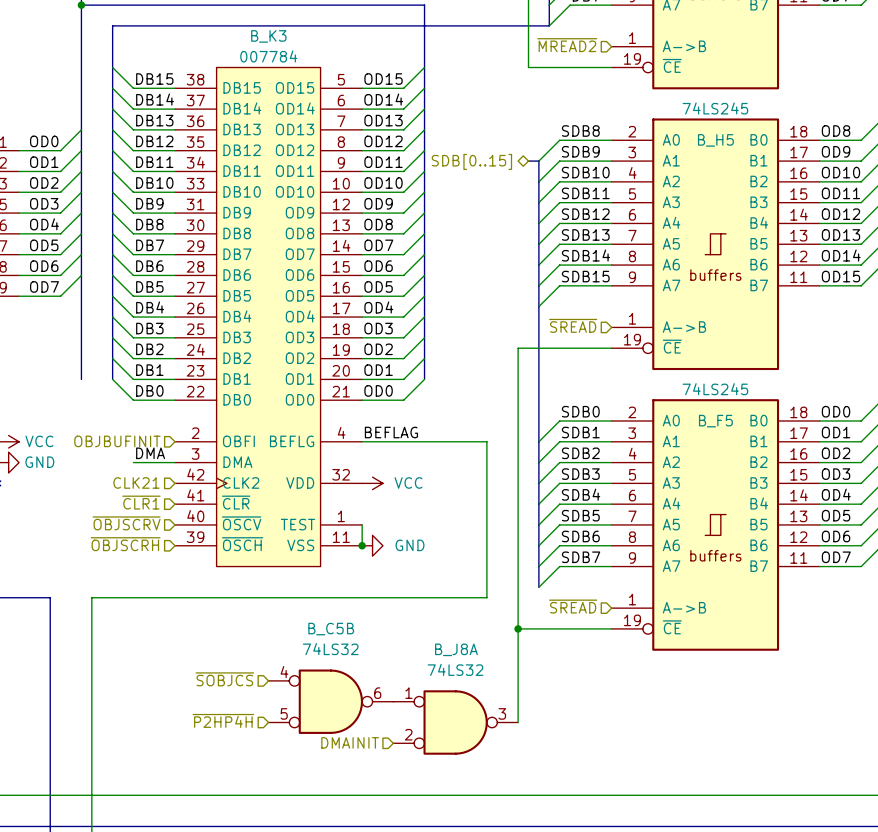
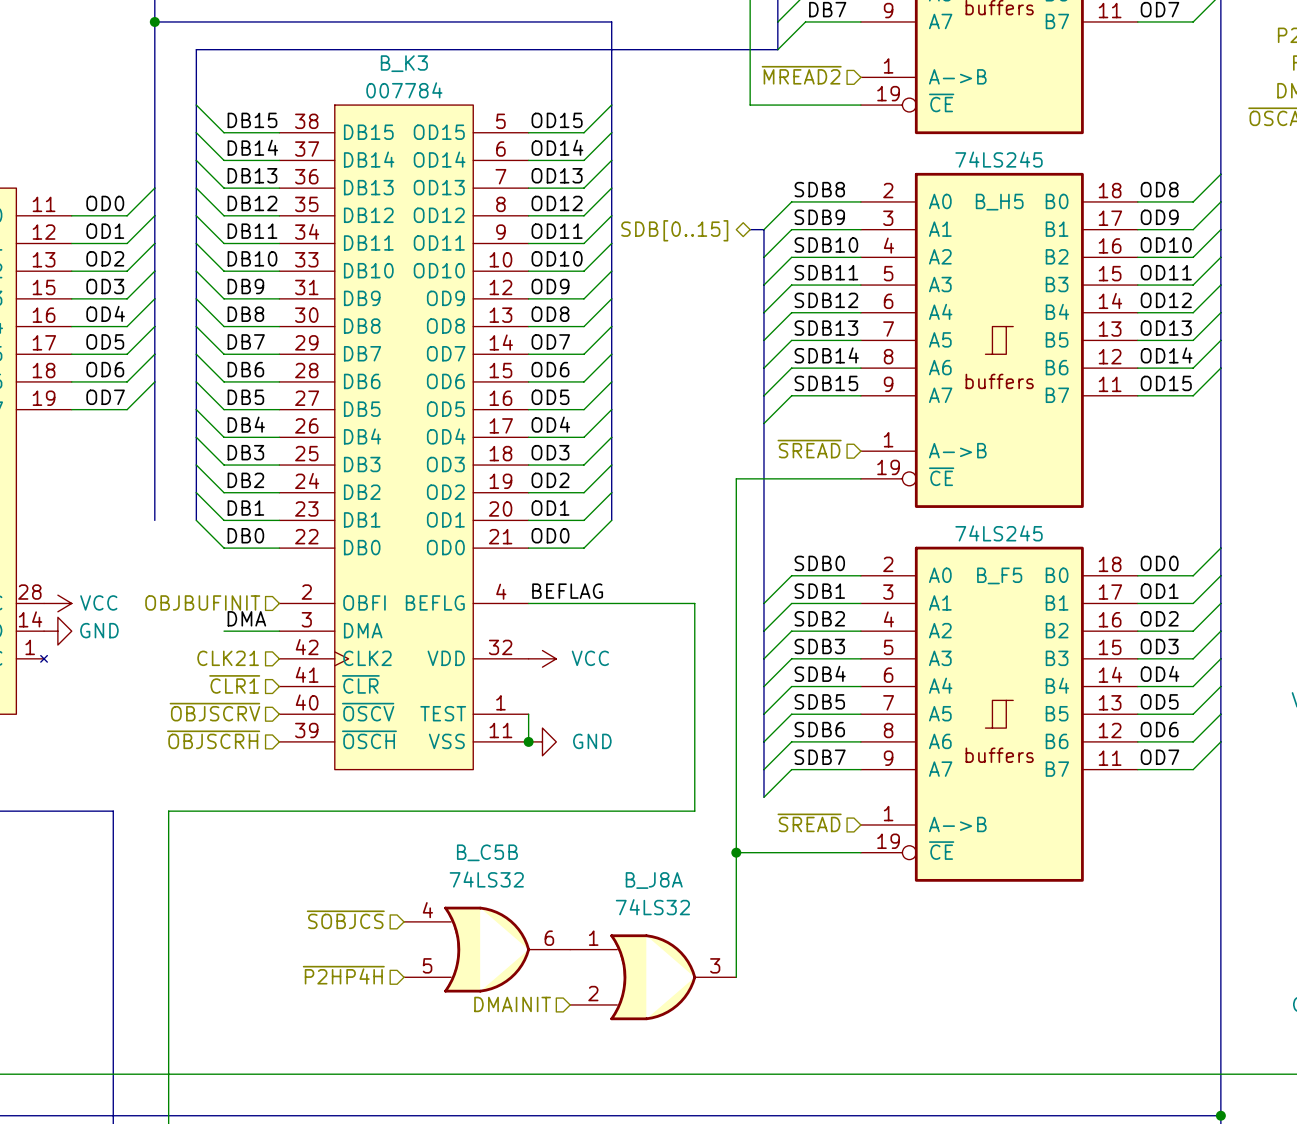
B_C5B symbol: [268, 669, 394, 734] -> [404, 906, 571, 993]
B_J8A symbol: [393, 690, 519, 755] -> [570, 934, 737, 1021]

